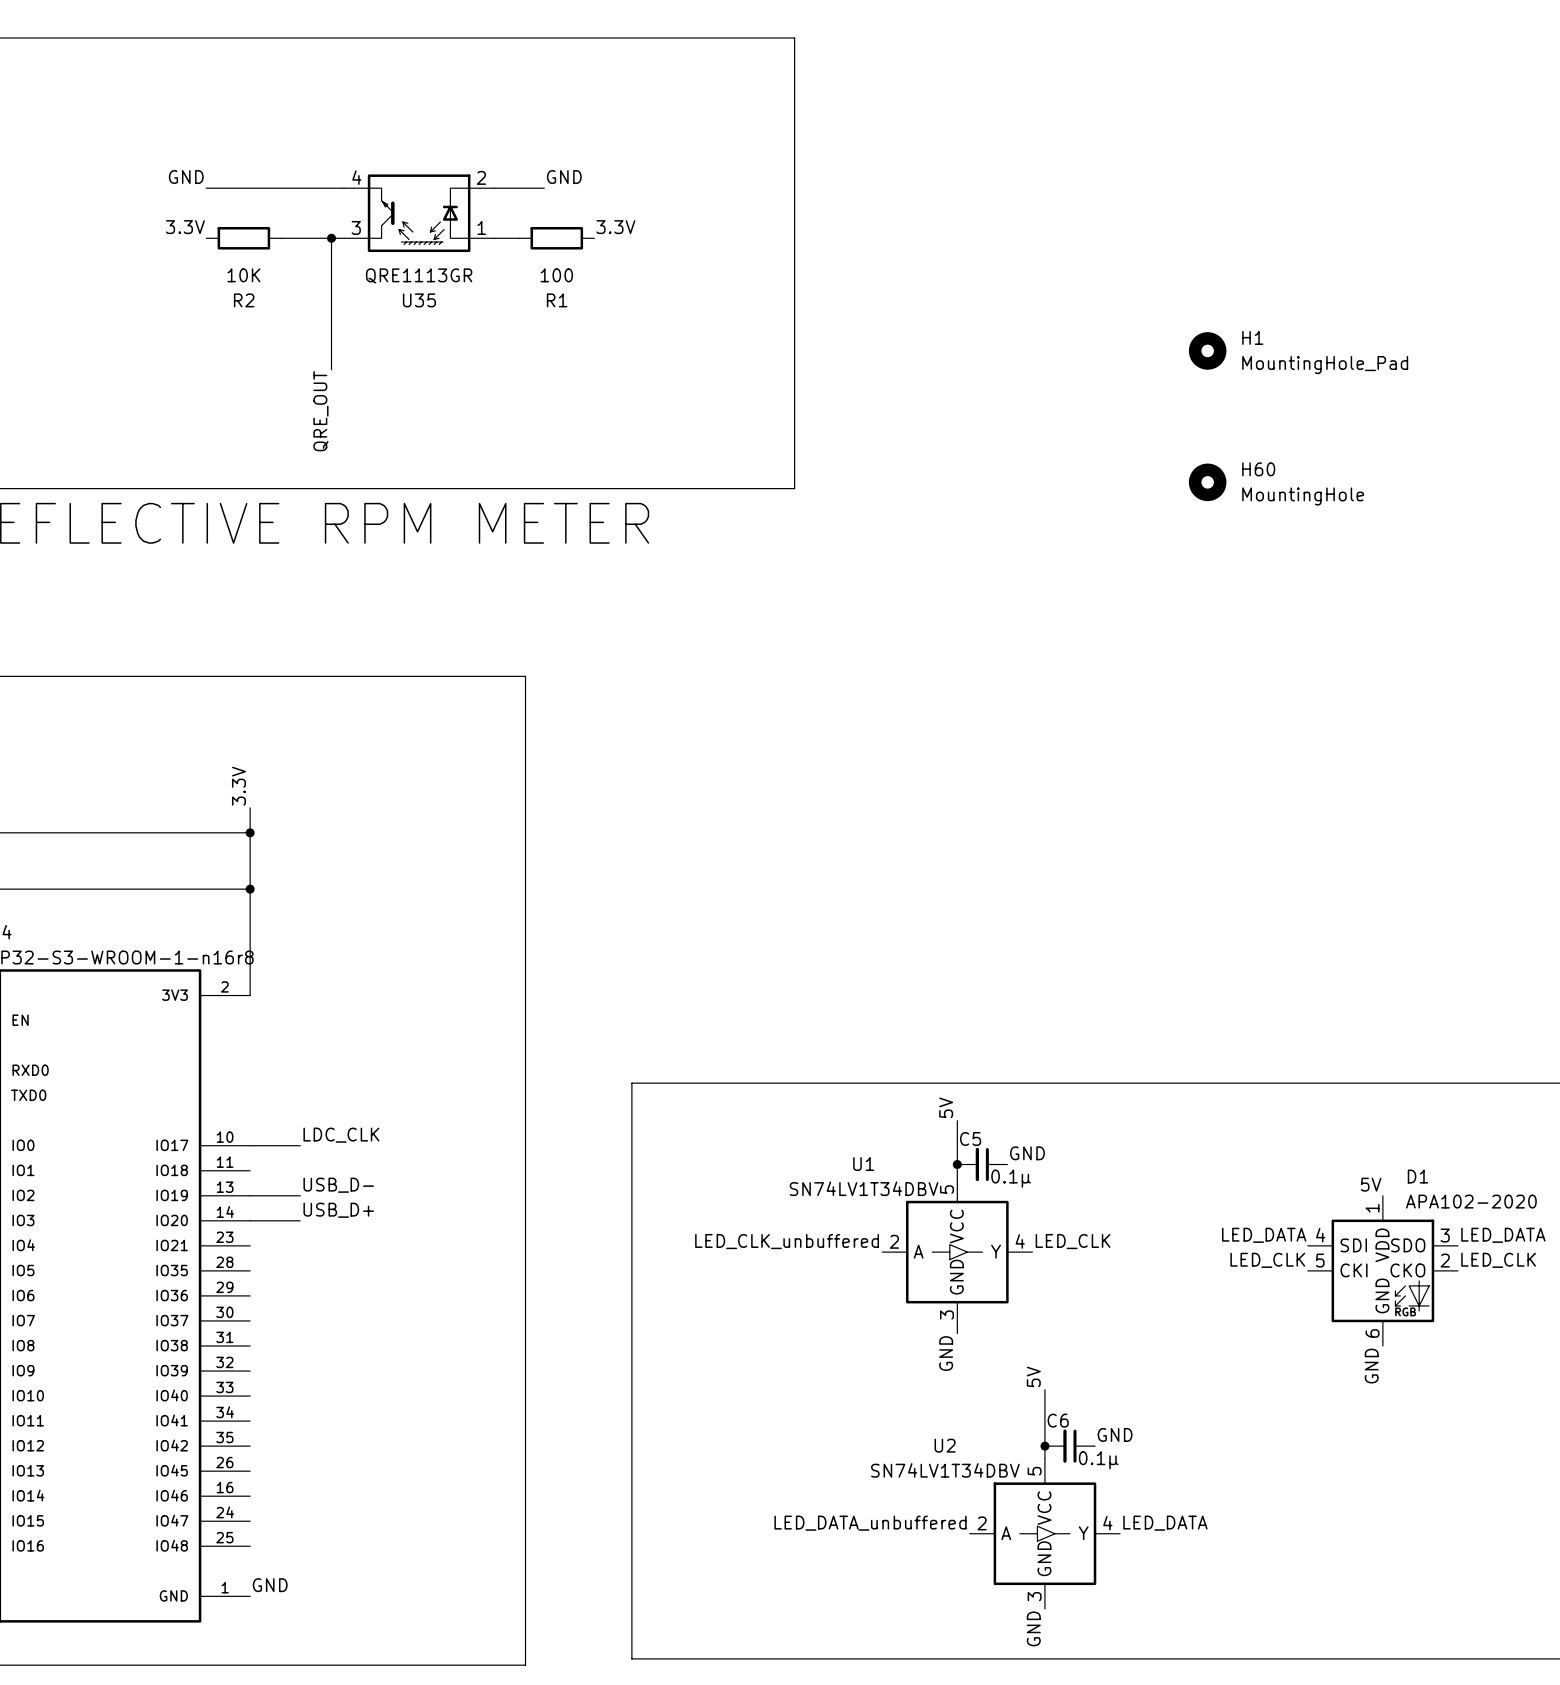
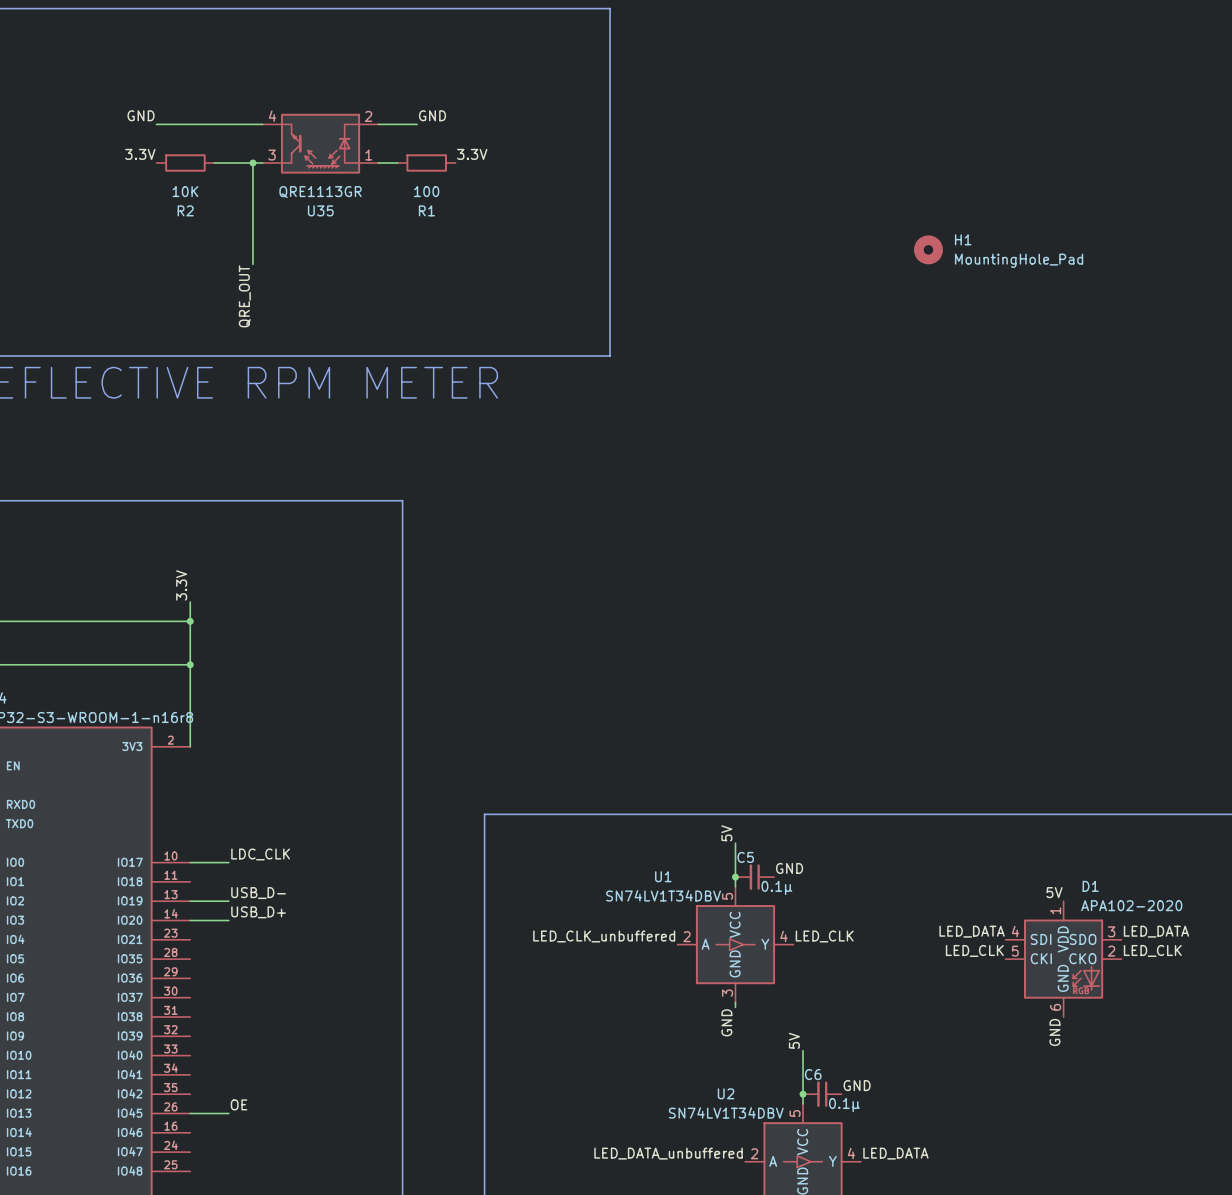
H60: MountingHole (1207, 482) -> none
label: none -> OE (239, 1104)
wire: none -> (190, 1113) (228, 1113)

